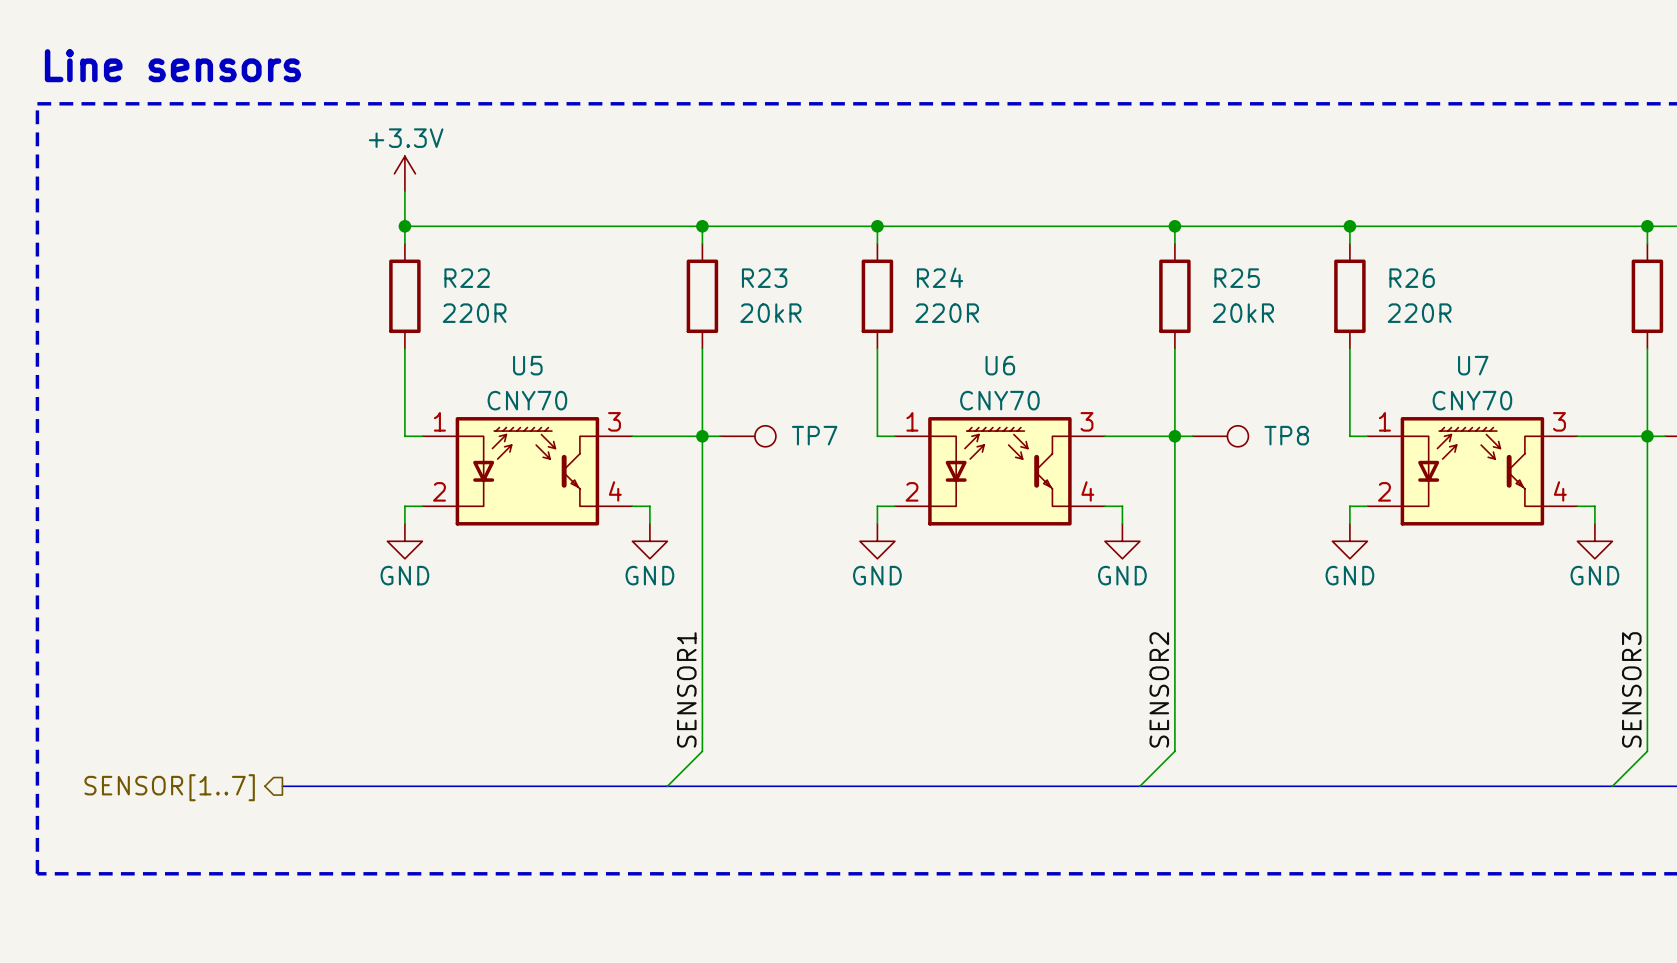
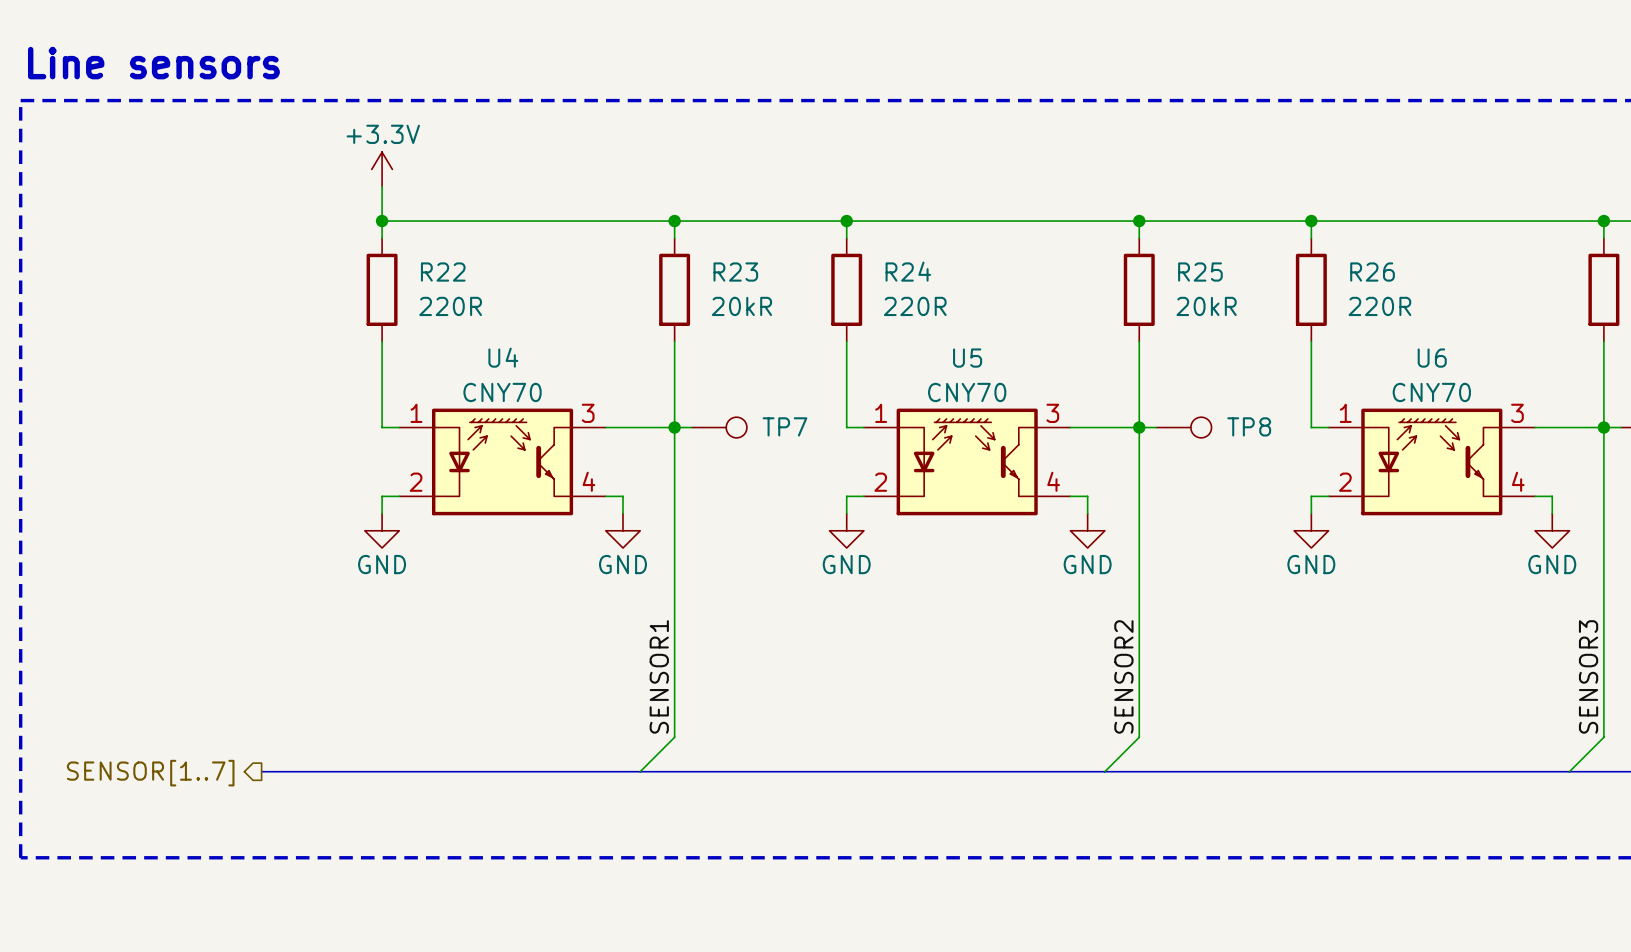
U5 name: U5 (527, 365) -> U4 (503, 357)
U6 name: U6 (1000, 365) -> U5 (967, 358)
U7 name: U7 (1473, 365) -> U6 (1432, 358)

